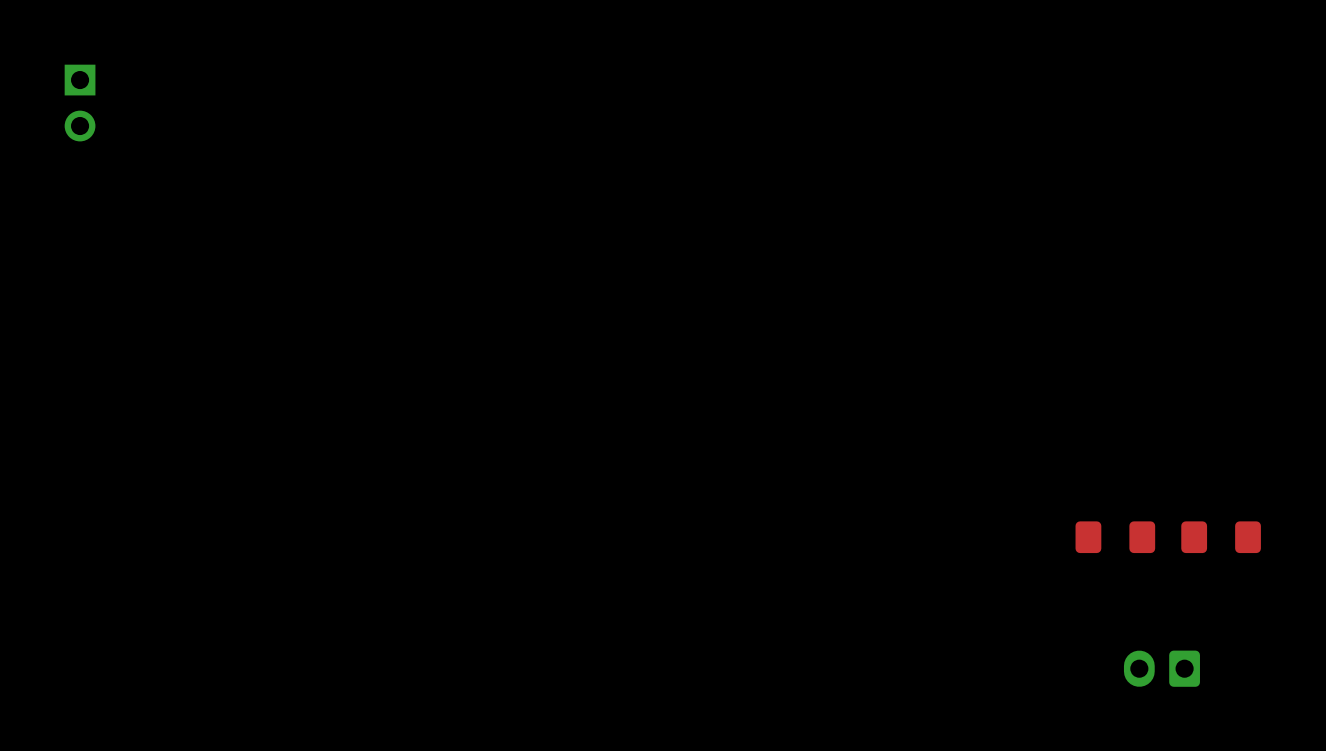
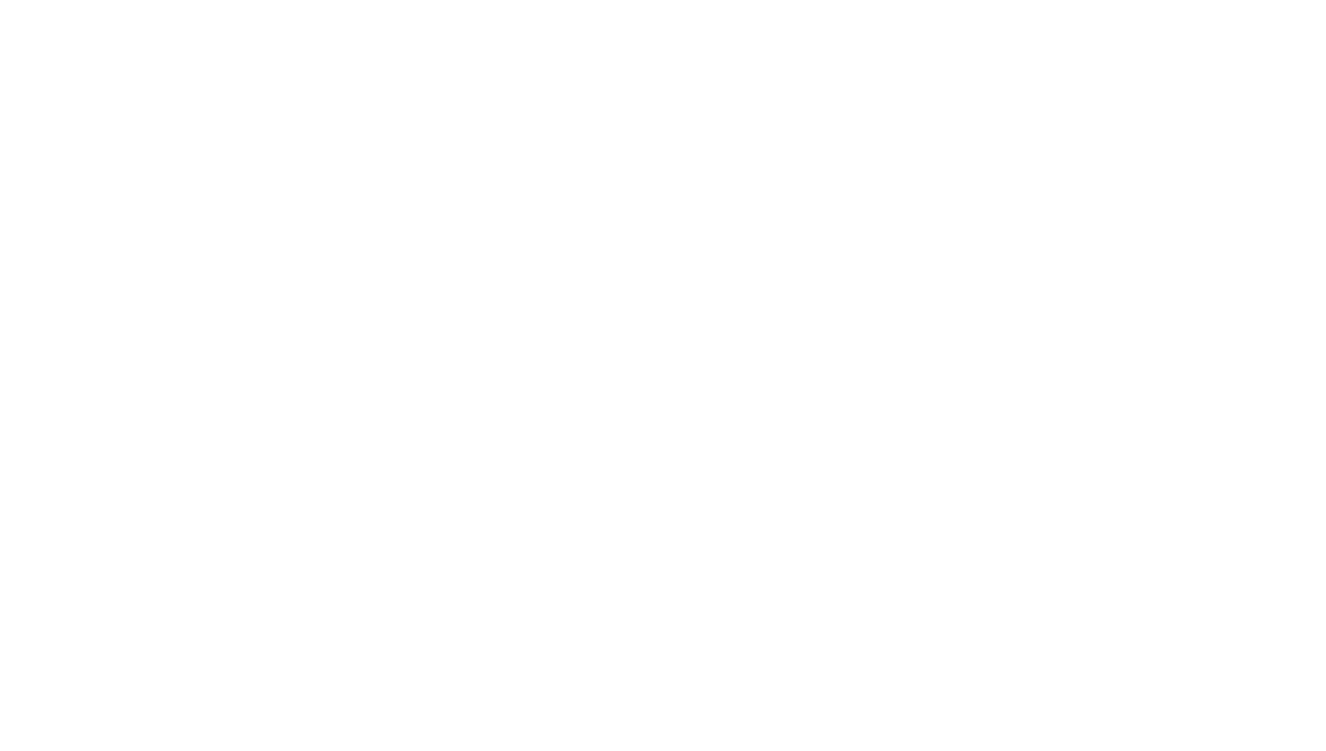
part: (80, 103) -> none
part: (1115, 537) -> none
part: (1221, 537) -> none
part: (1161, 668) -> none

